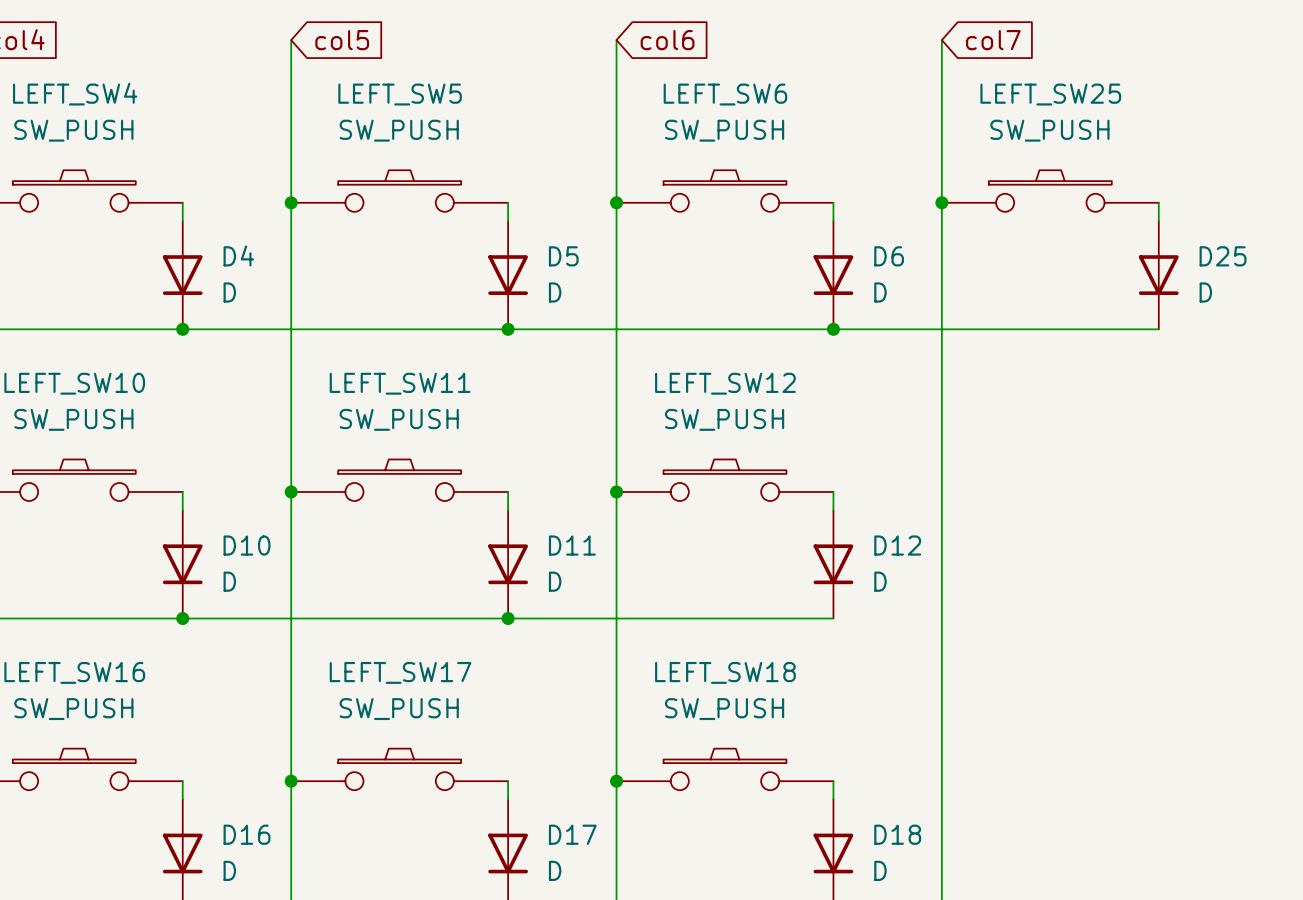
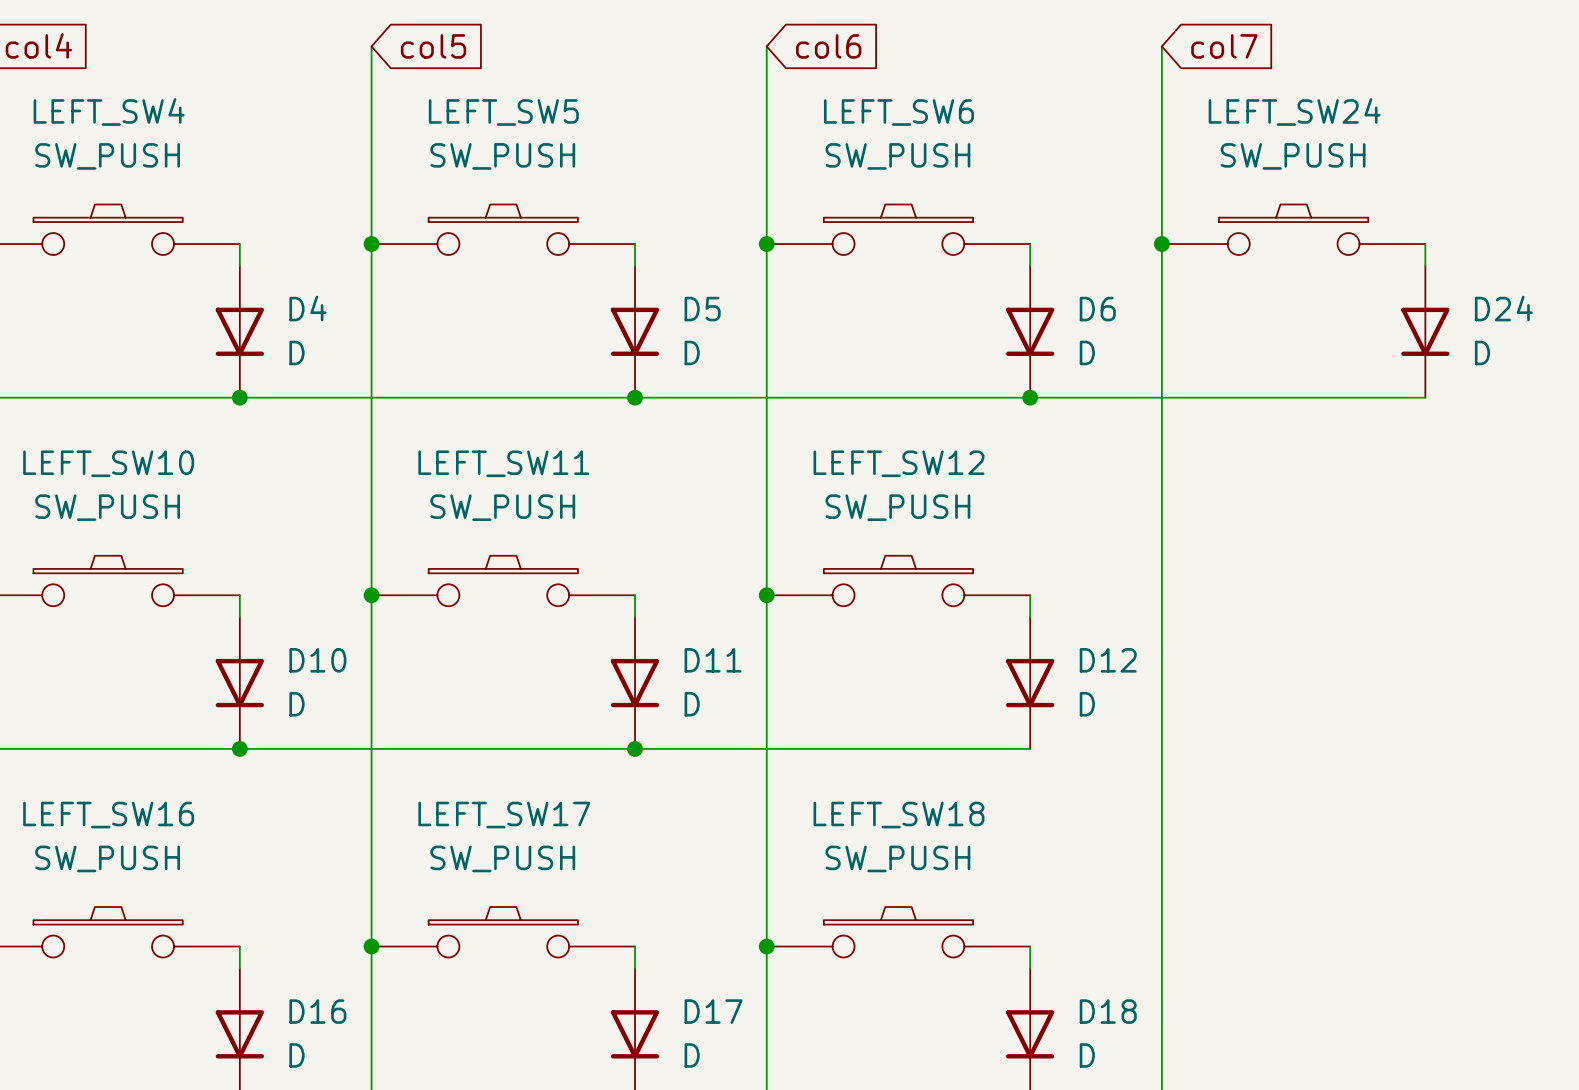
LEFT_SW25 name: LEFT_SW25 (1050, 94) -> LEFT_SW24 (1294, 111)
D25 name: D25 (1223, 256) -> D24 (1503, 308)

